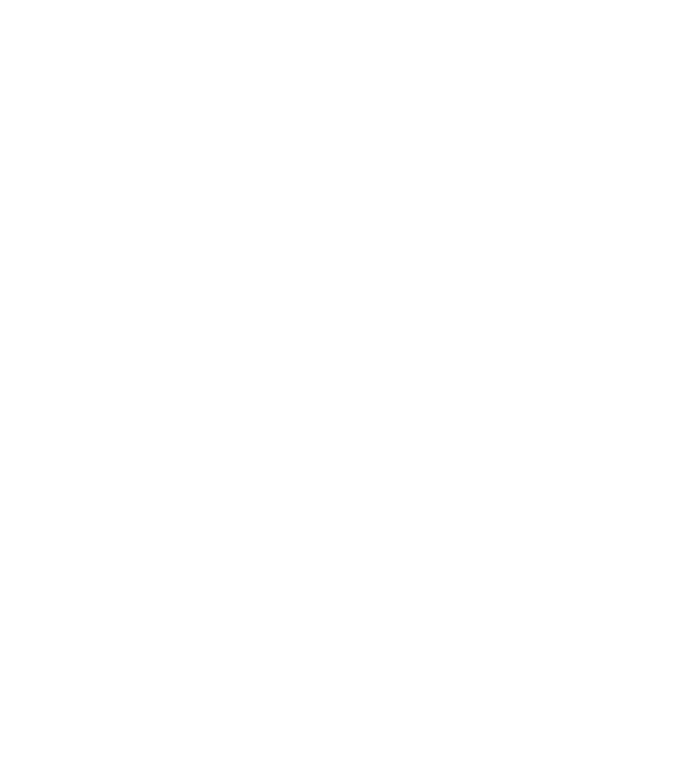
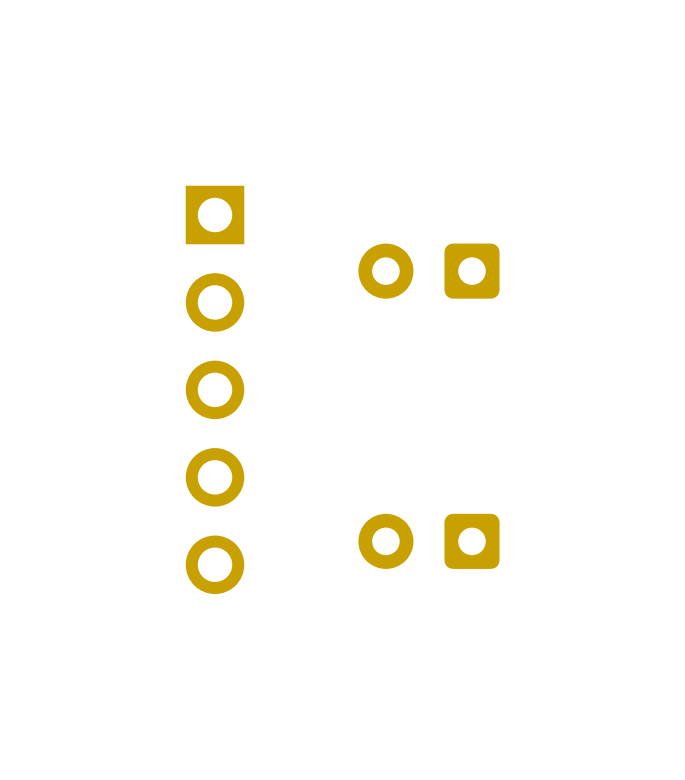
part: none -> (428, 271)
part: none -> (215, 389)
part: none -> (428, 541)

